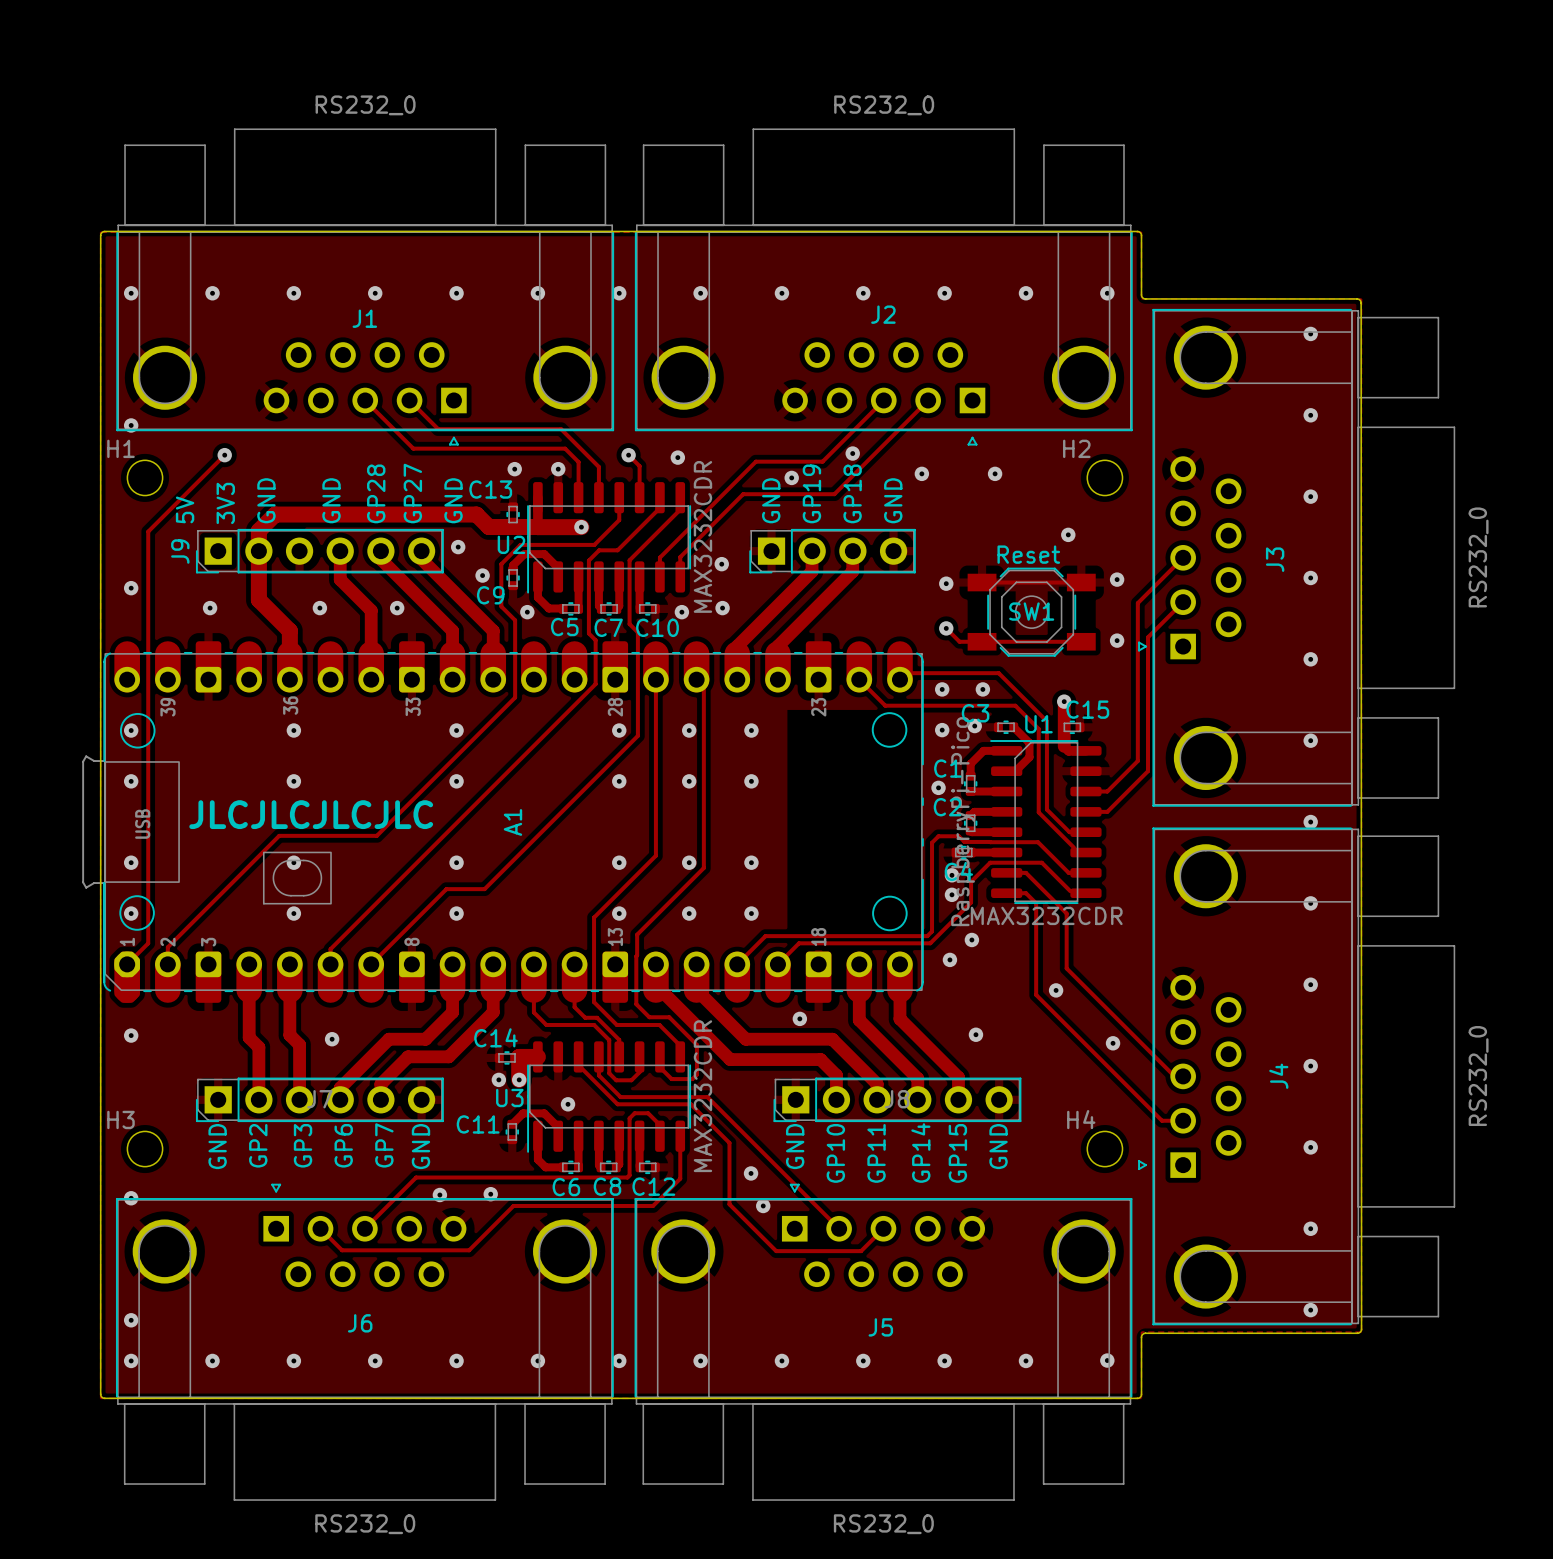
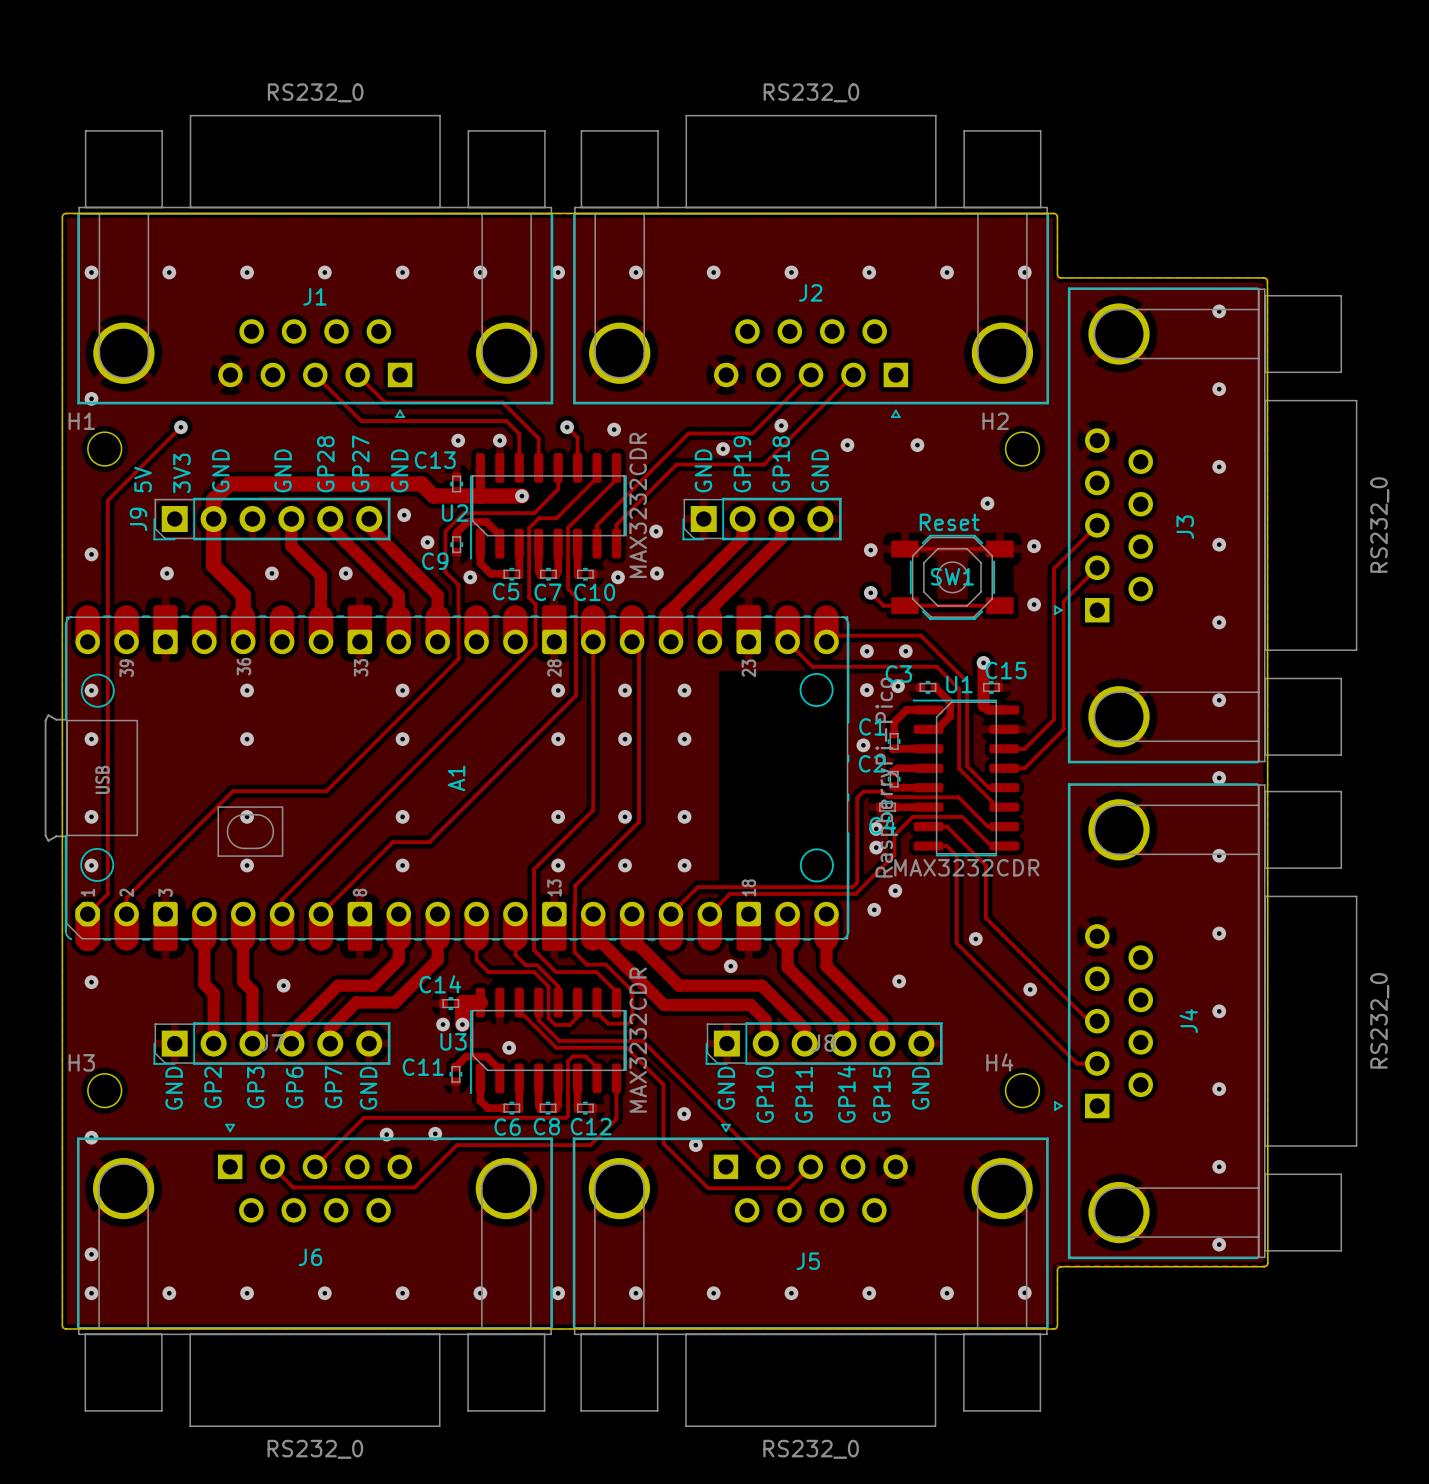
text: JLCJLCJLCJLC (311, 814) -> none

